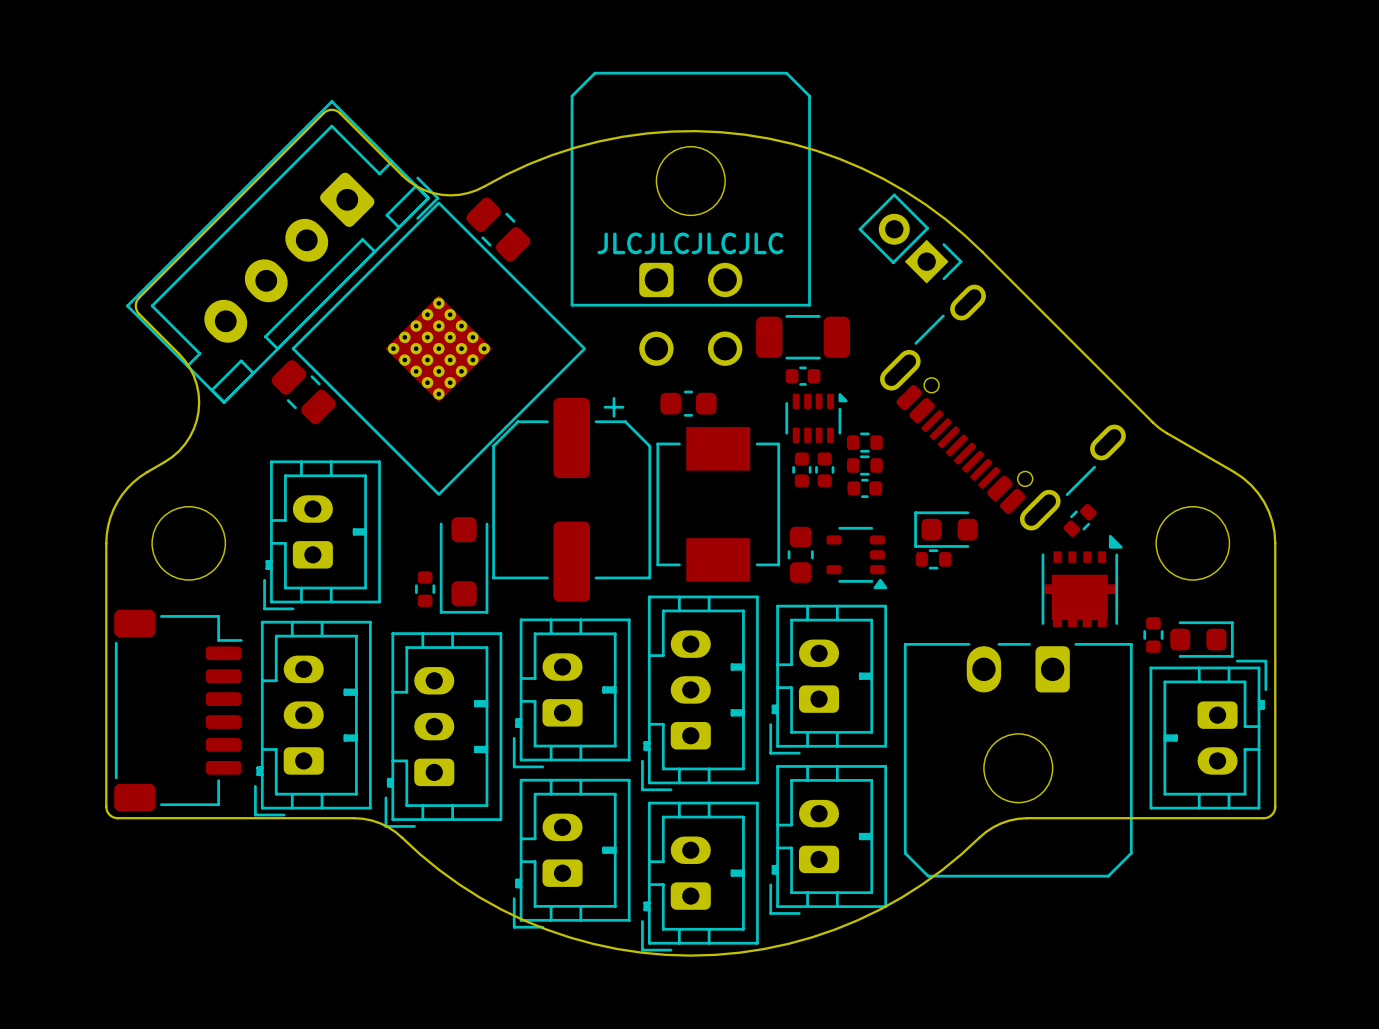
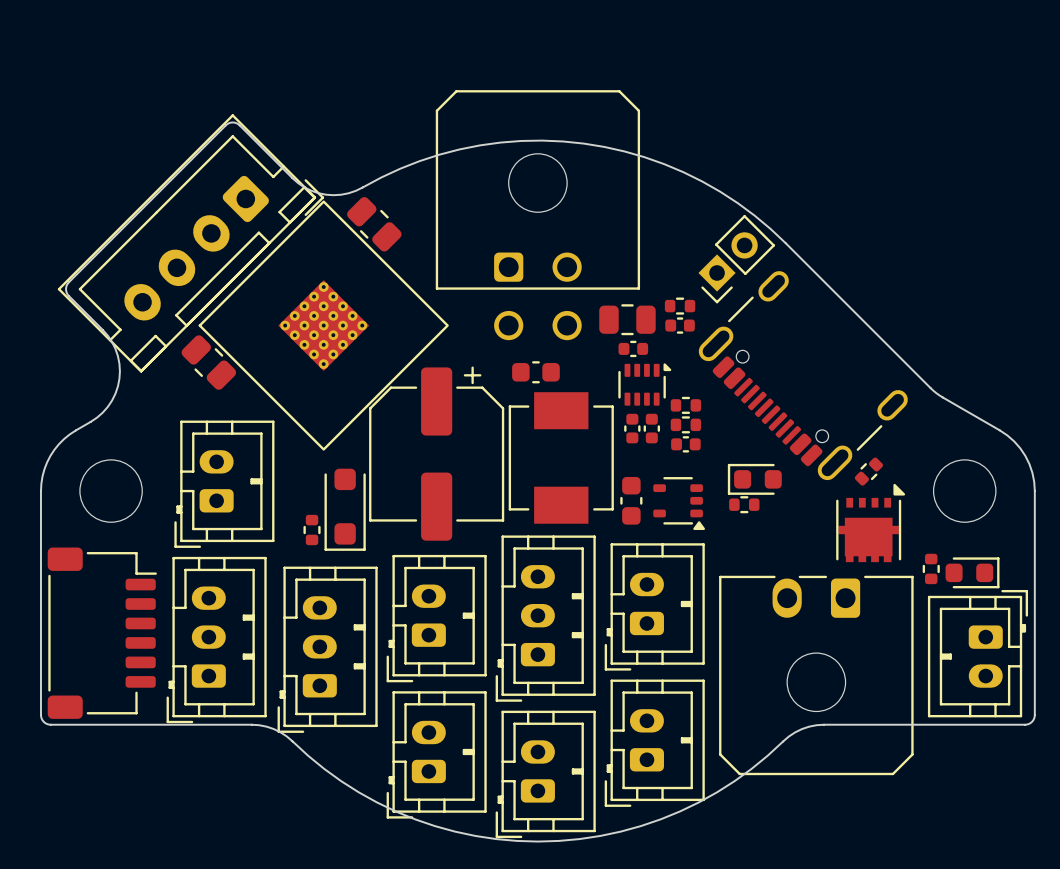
part rotation: 0° (910, 238) -> 90° clockwise (736, 259)
text: JLCJLCJLCJLC (690, 243) -> none
part footprint: [756, 315, 850, 360] -> [599, 304, 656, 336]
part: none -> (680, 306)
part: none -> (680, 325)

